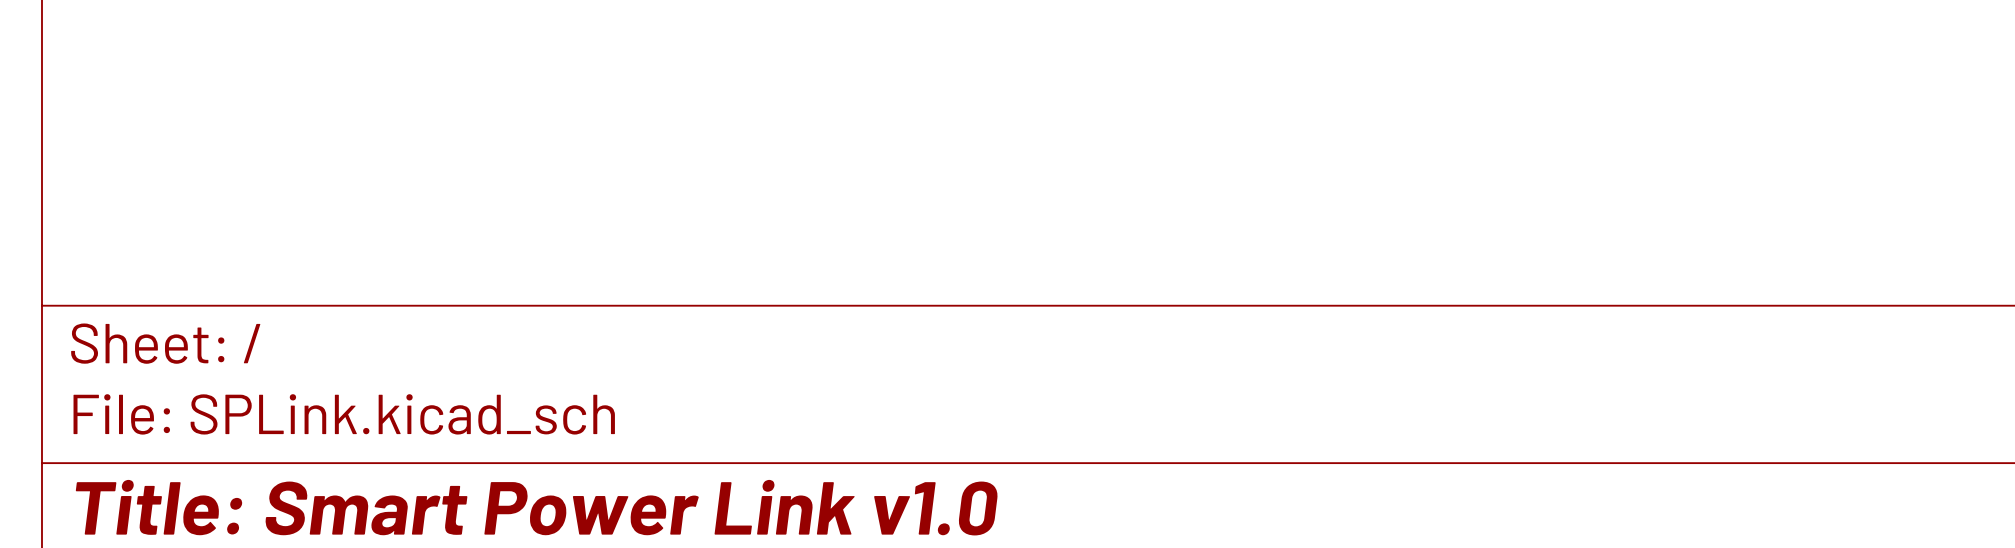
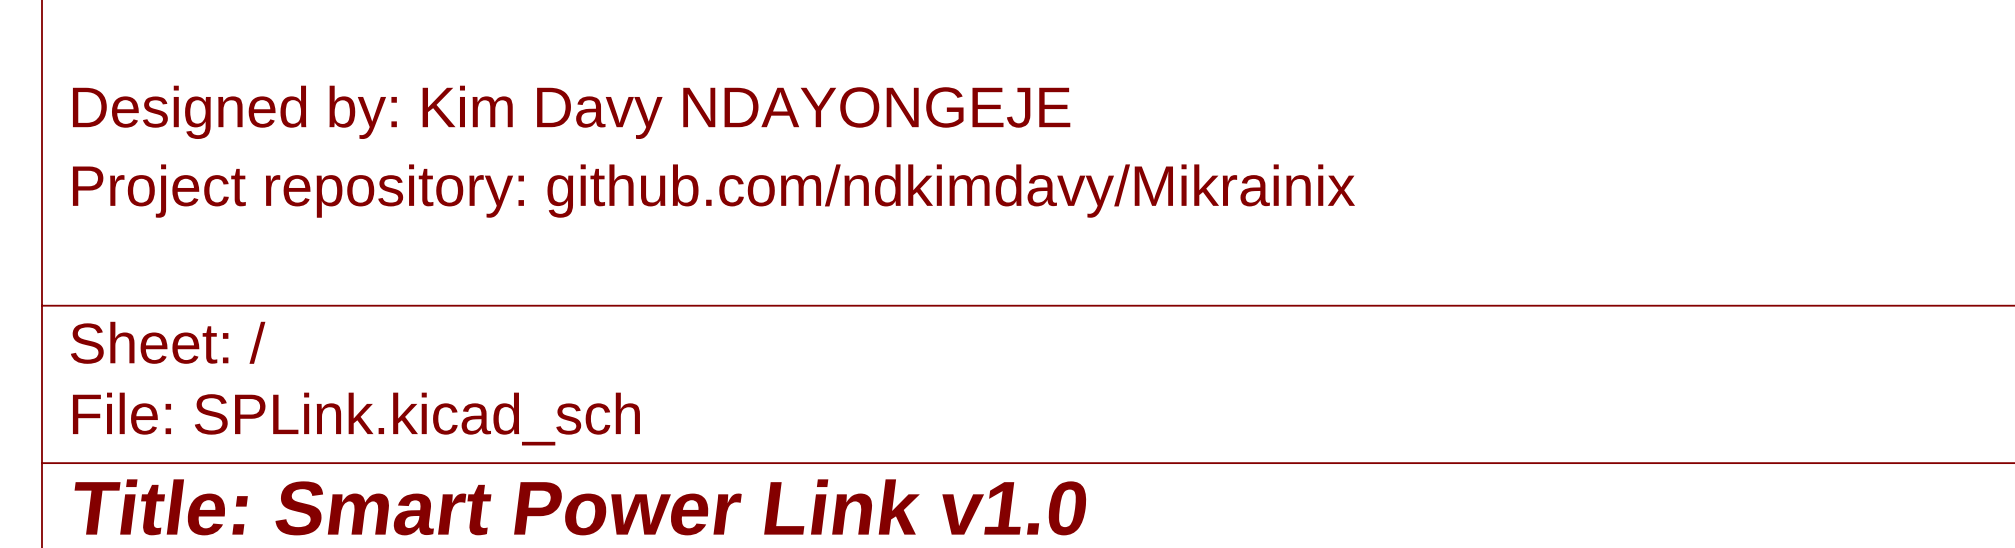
title block: none -> Designed by: Kim Davy NDAYONGEJE (571, 112)
title block: none -> Project repository: github.com/ndkimdavy/Mikrainix (714, 191)

